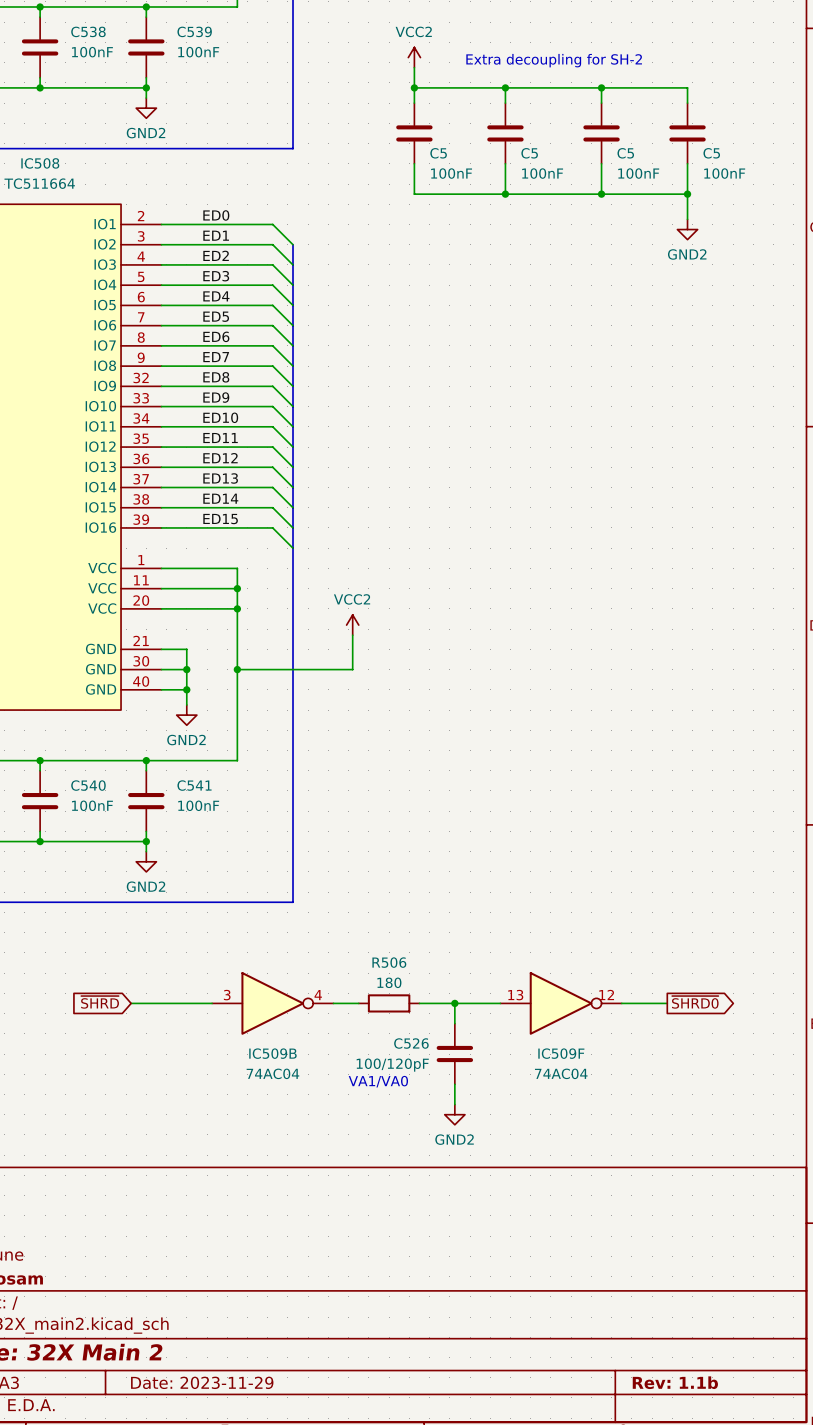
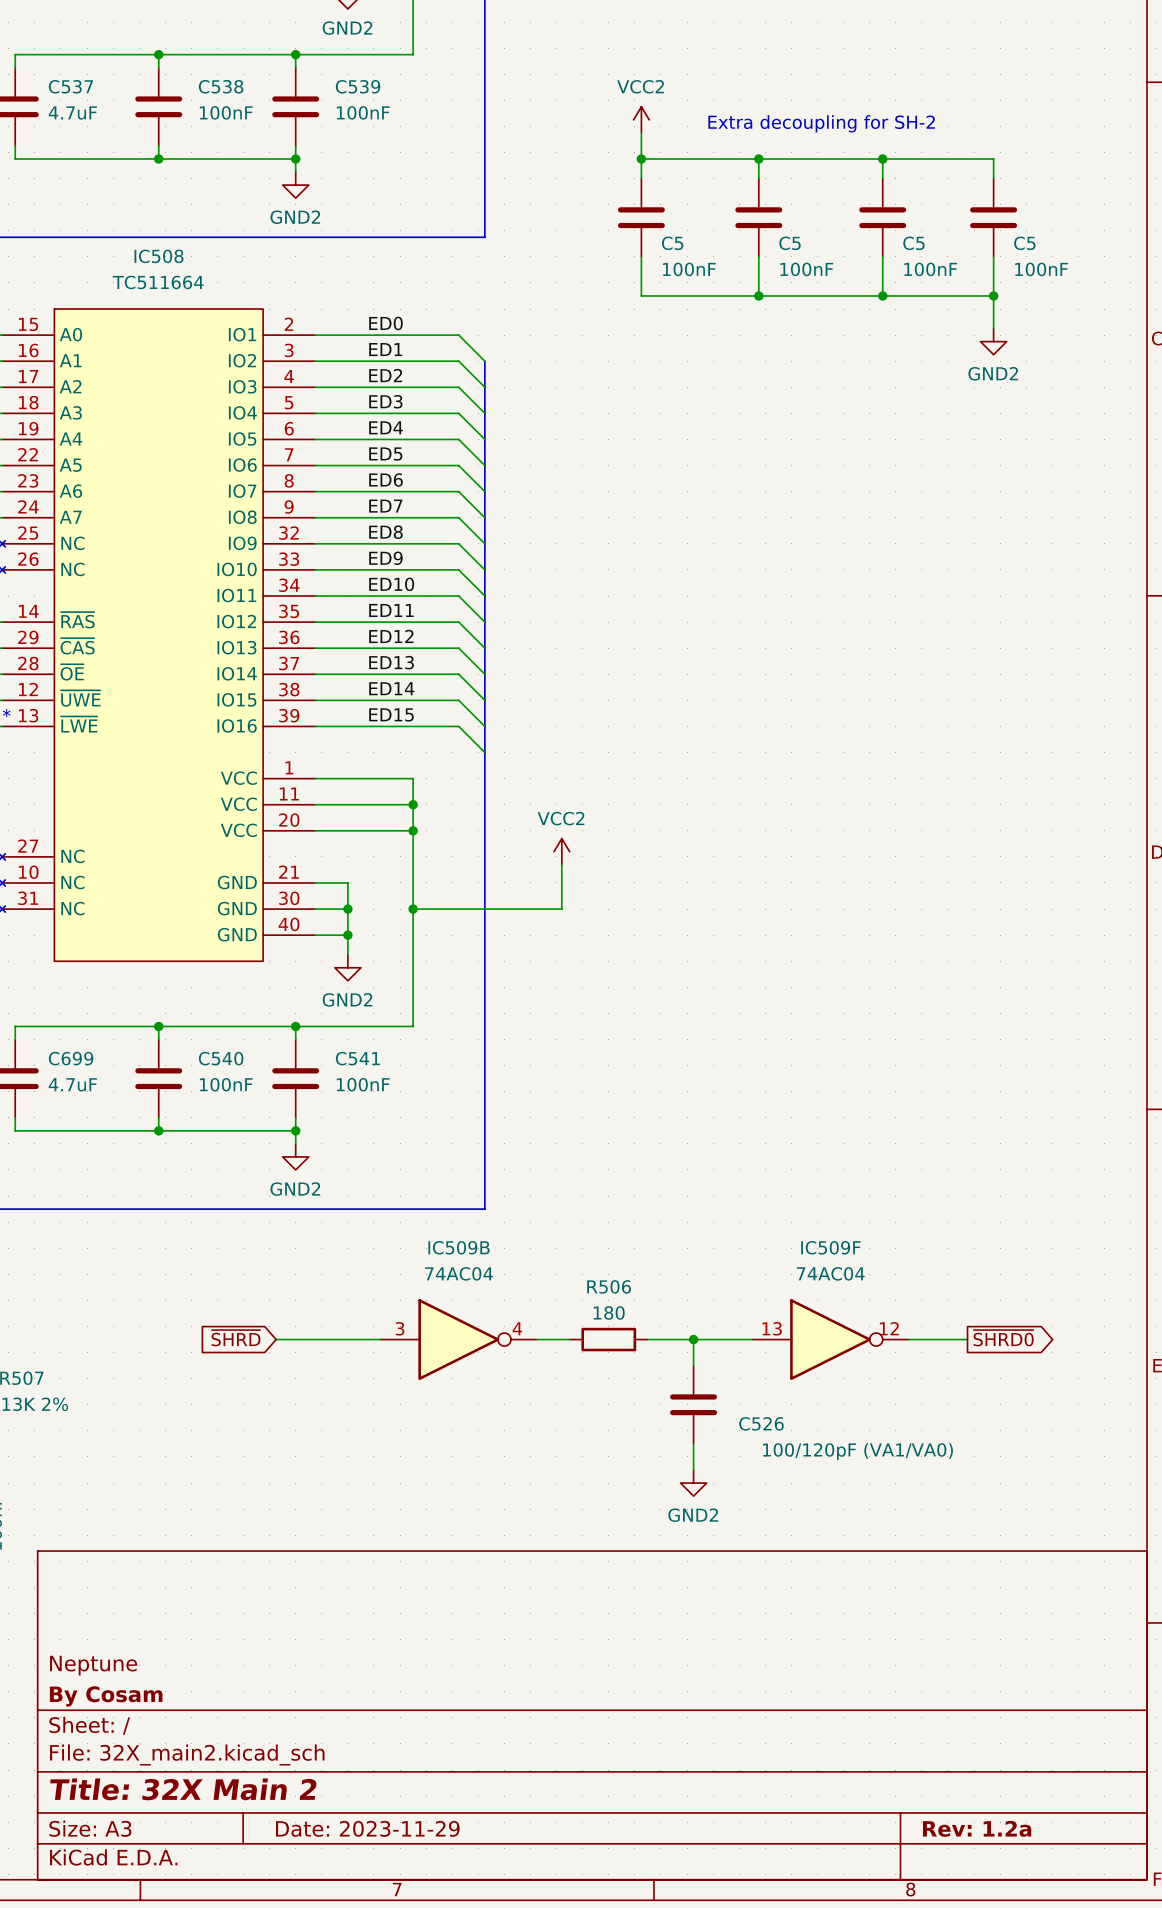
C526 name position: C526 (411, 1043) -> C526 (761, 1423)
IC509B name position: IC509B (272, 1053) -> IC509B (459, 1247)
IC509F name position: IC509F (561, 1053) -> IC509F (830, 1247)
C526 value: 100/120pF (392, 1065) -> 100/120pF (VA1/VA0) (858, 1451)
IC509B value position: 74AC04 (272, 1073) -> 74AC04 (459, 1273)
IC509F value position: 74AC04 (561, 1073) -> 74AC04 (830, 1273)
text: VA1/VA0 (378, 1081) -> none
title block: Rev: 1.1b (675, 1382) -> Rev: 1.2a (977, 1828)

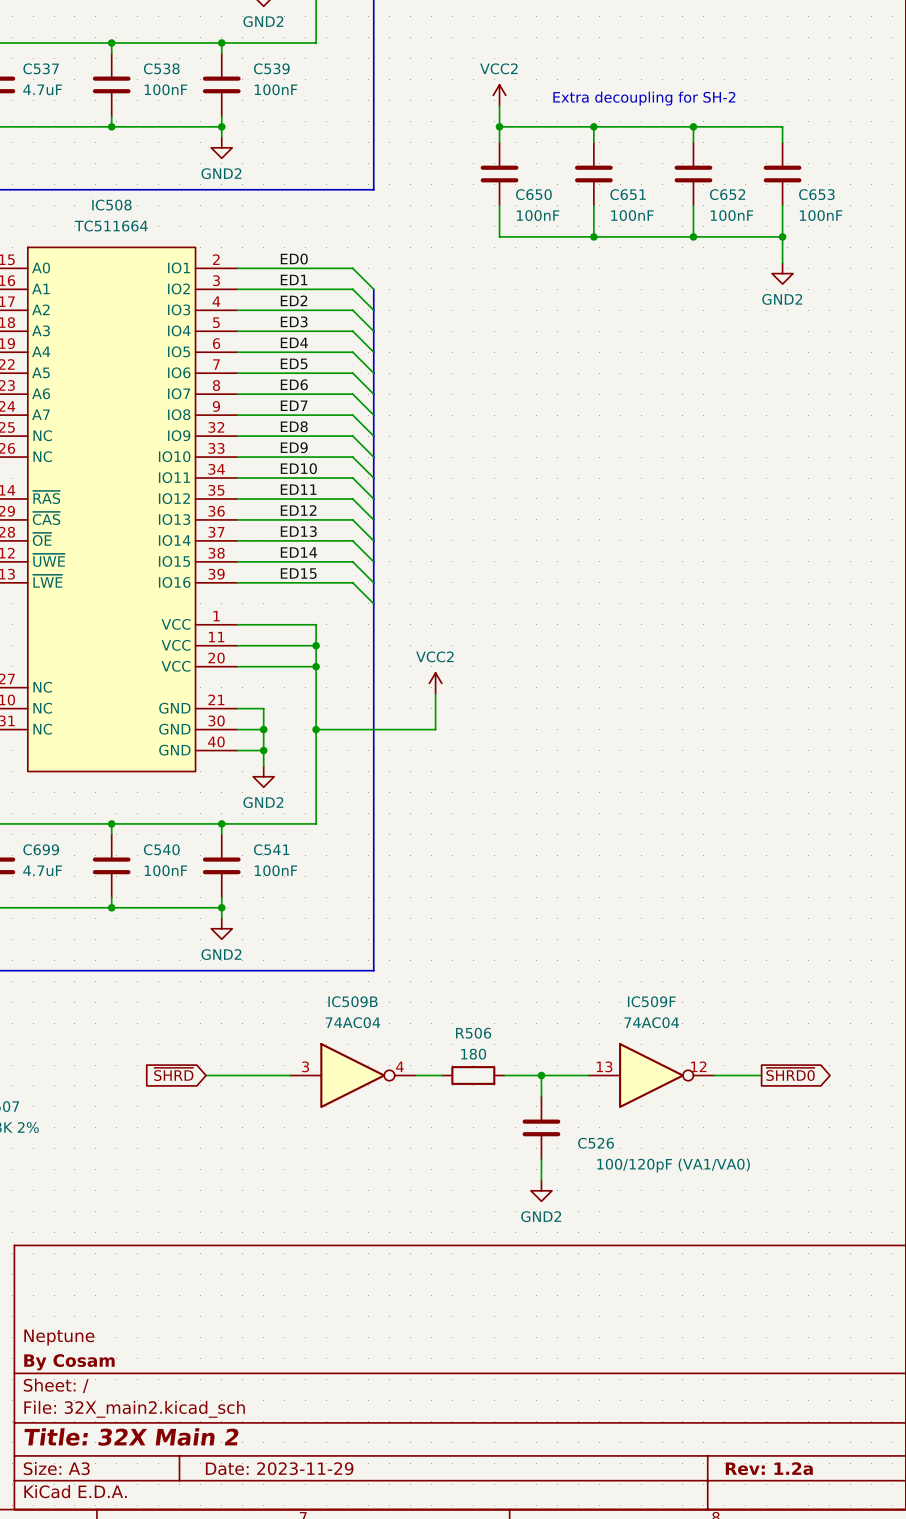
C5 name: C5 (672, 243) -> C650 (533, 194)
C5 name: C5 (790, 243) -> C651 (628, 194)
C5 name: C5 (913, 243) -> C652 (727, 194)
C5 name: C5 (1024, 243) -> C653 (816, 194)

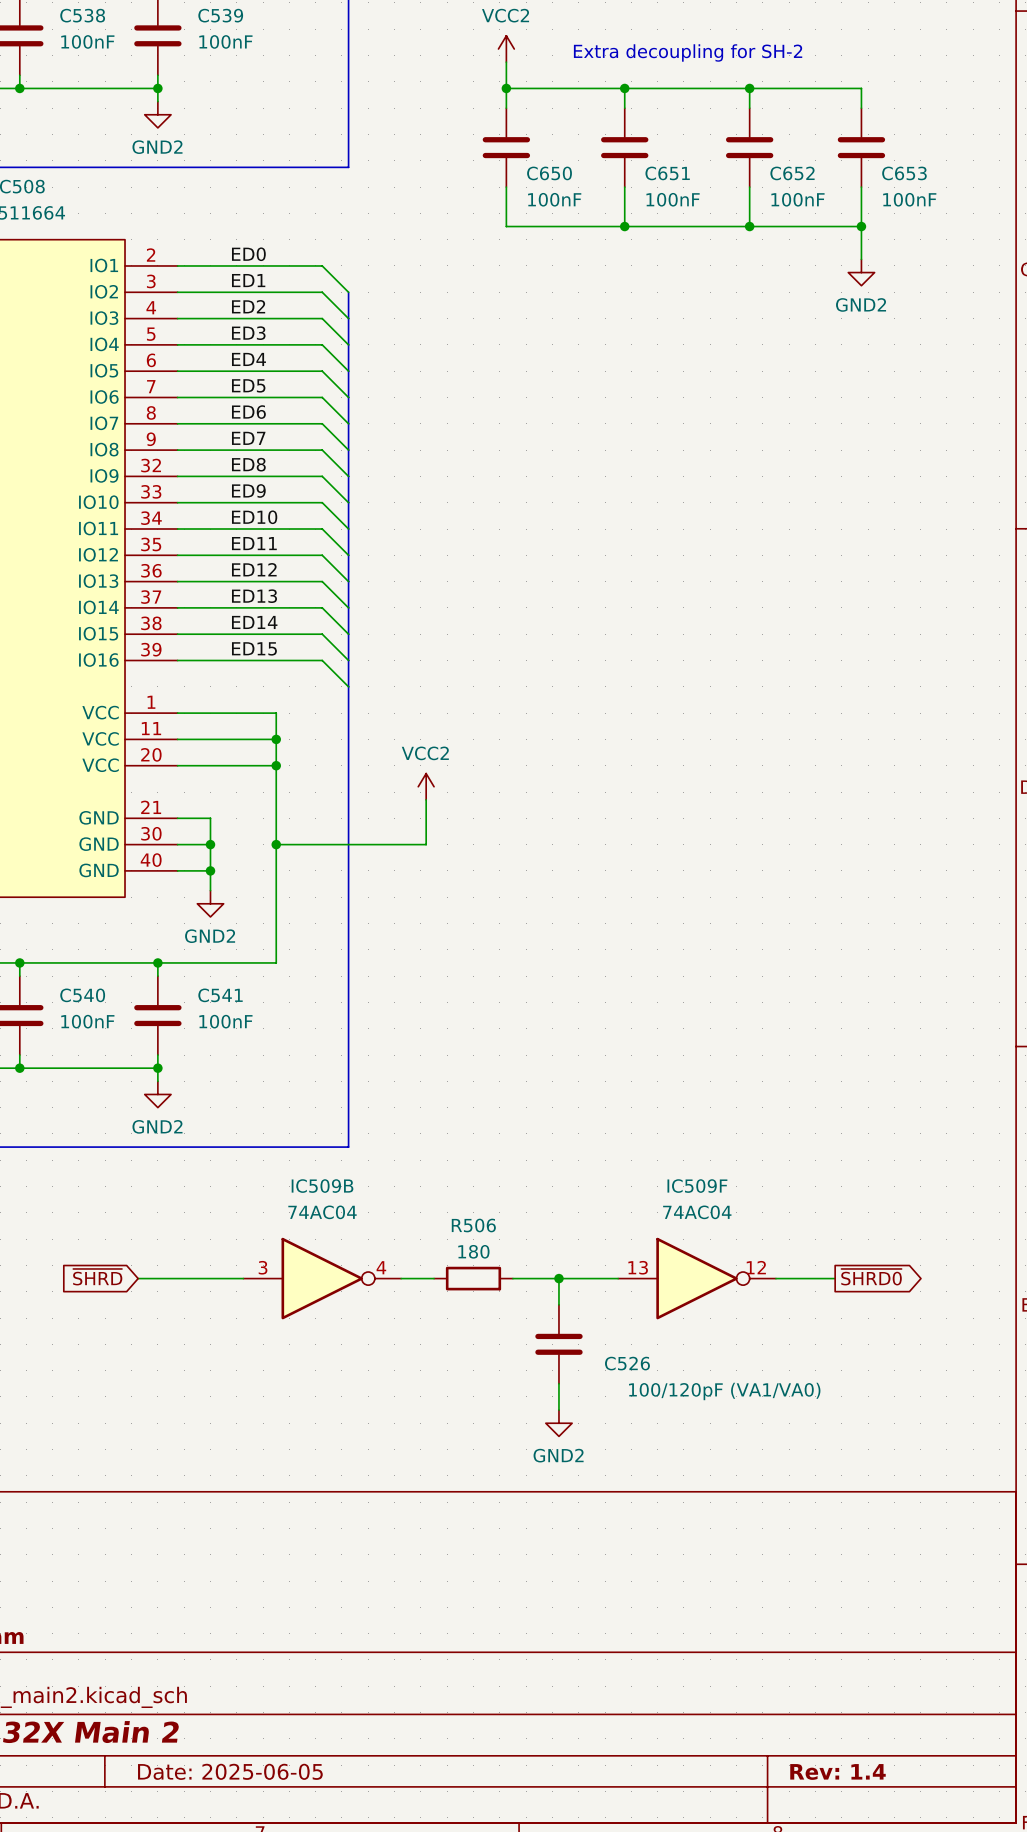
title block: Date: 2023-11-29 (279, 1468) -> Date: 2025-06-05 (230, 1771)
title block: Rev: 1.2a (769, 1468) -> Rev: 1.4 (837, 1771)

